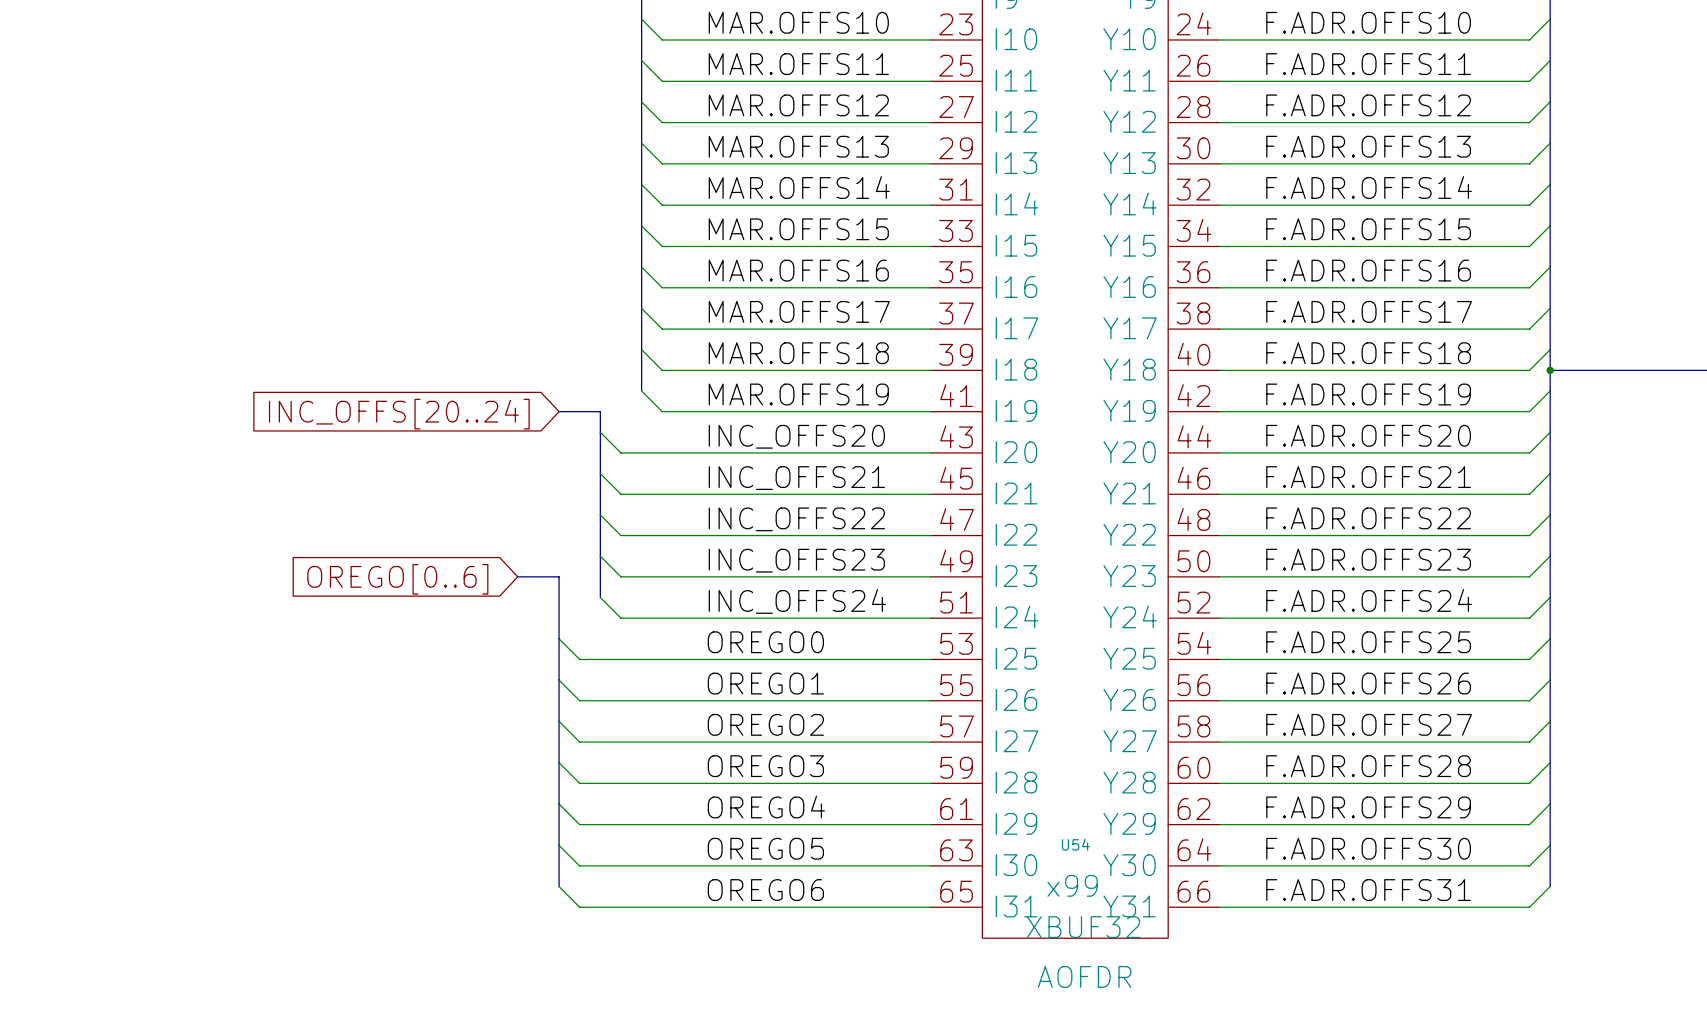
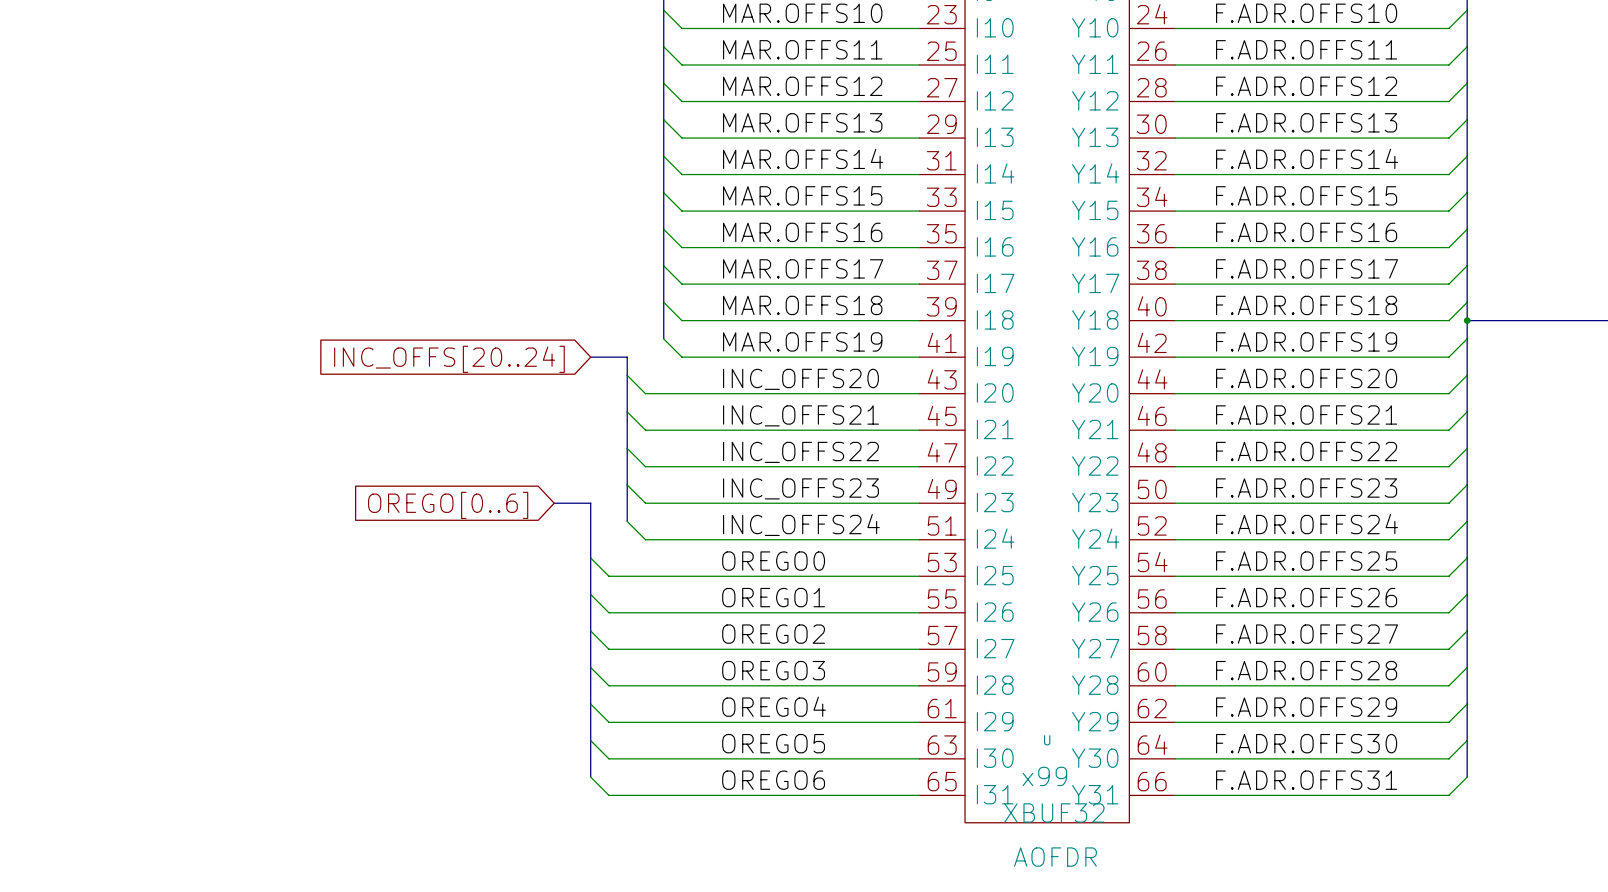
U54 name: U54 (1075, 844) -> U (1047, 740)

